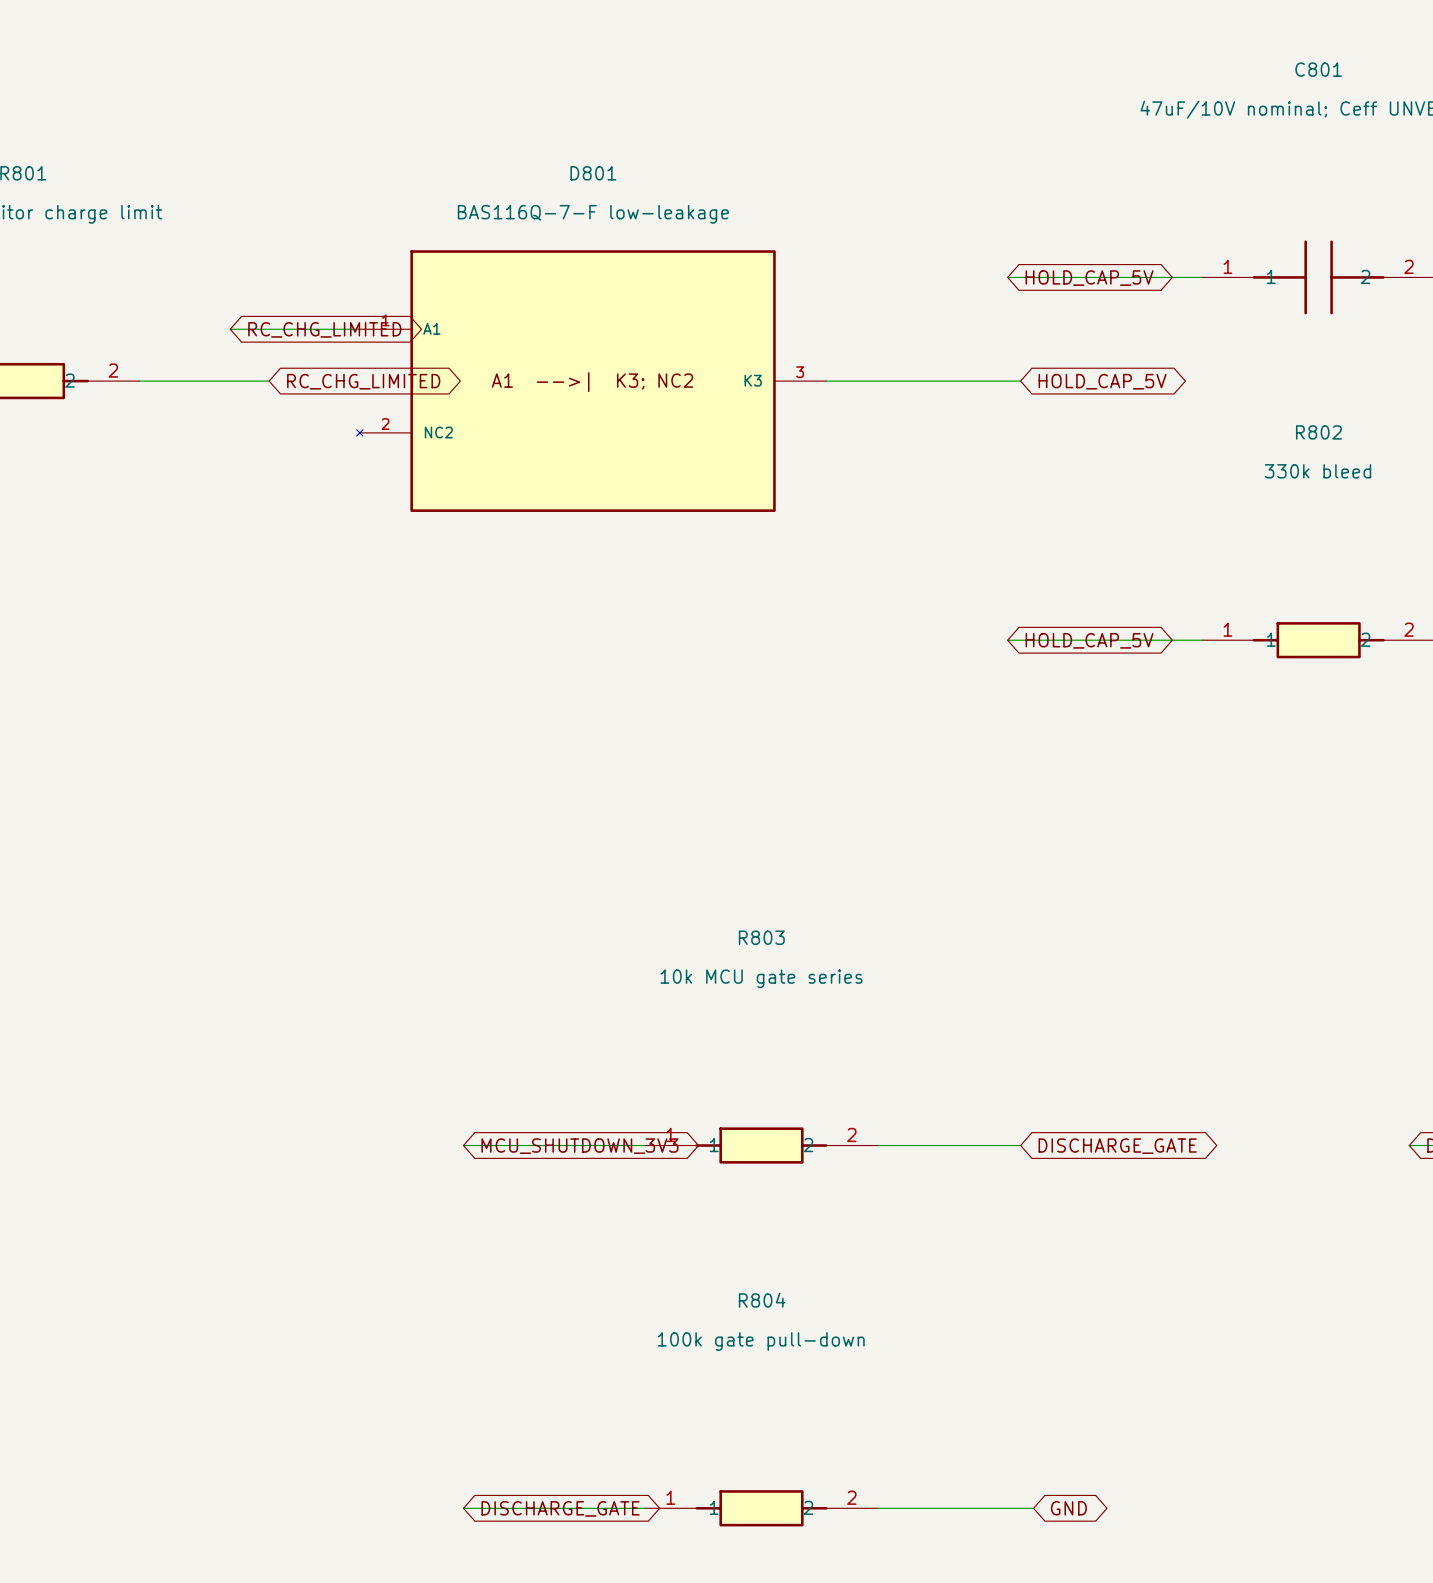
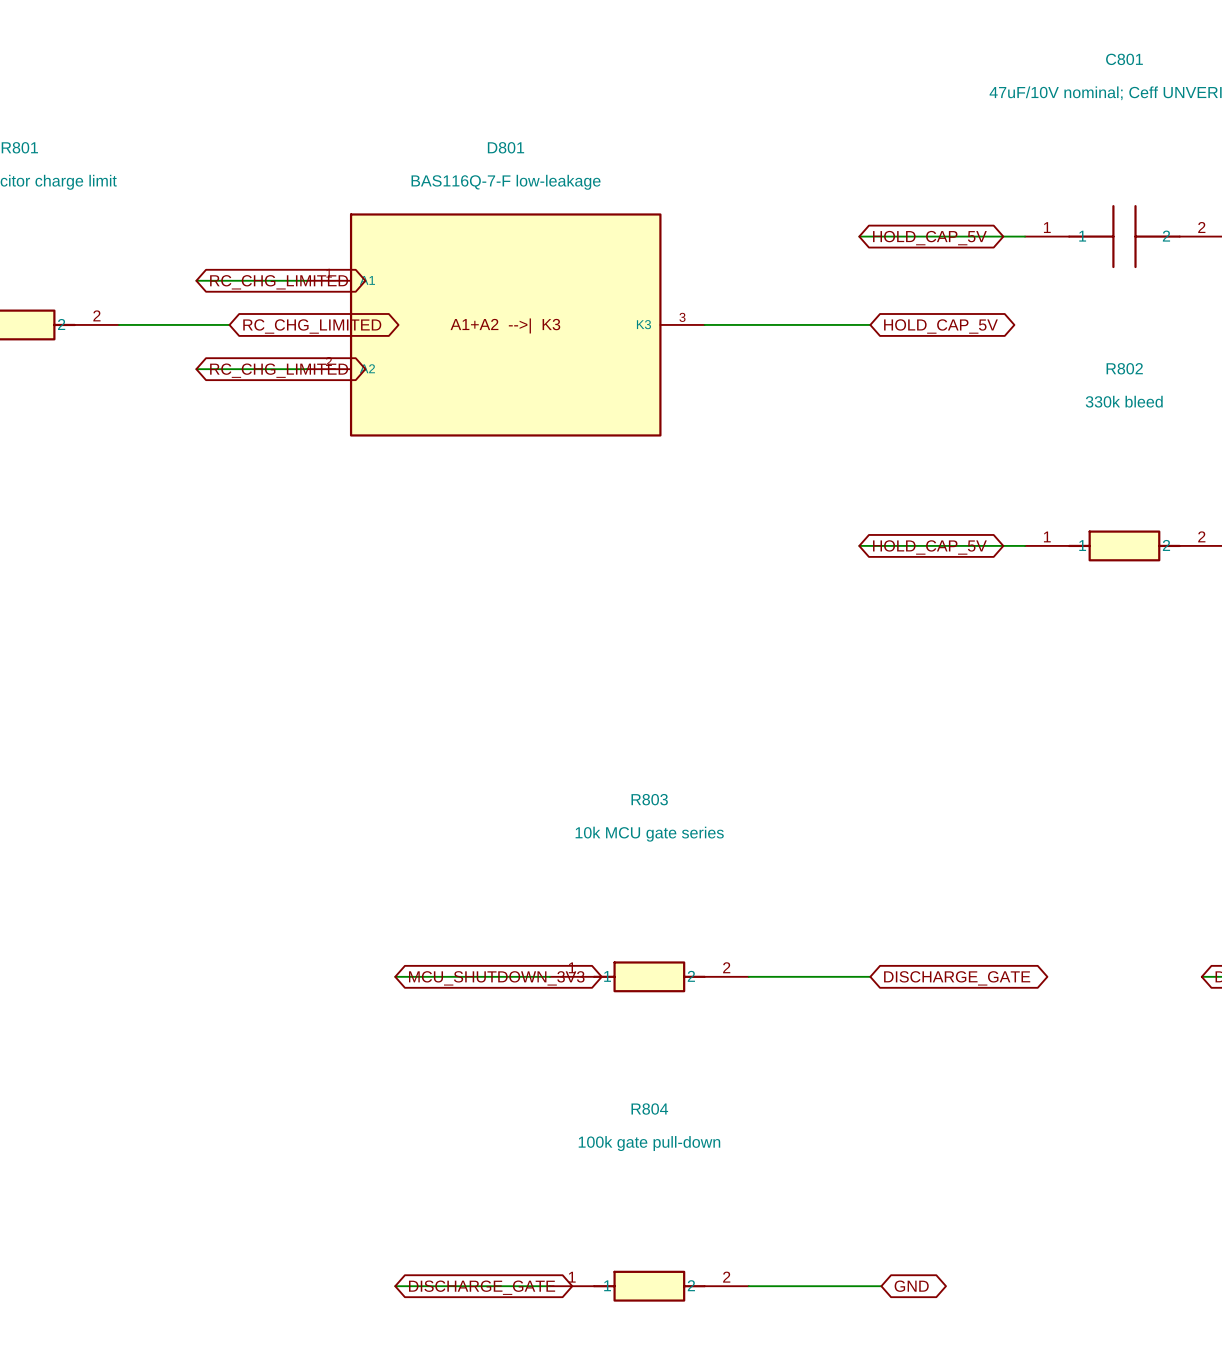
D801 symbol: [356, 250, 827, 512] -> [306, 213, 705, 437]
wire: none -> (196, 369) (306, 369)
global label: none -> RC_CHG_LIMITED (279, 370)

